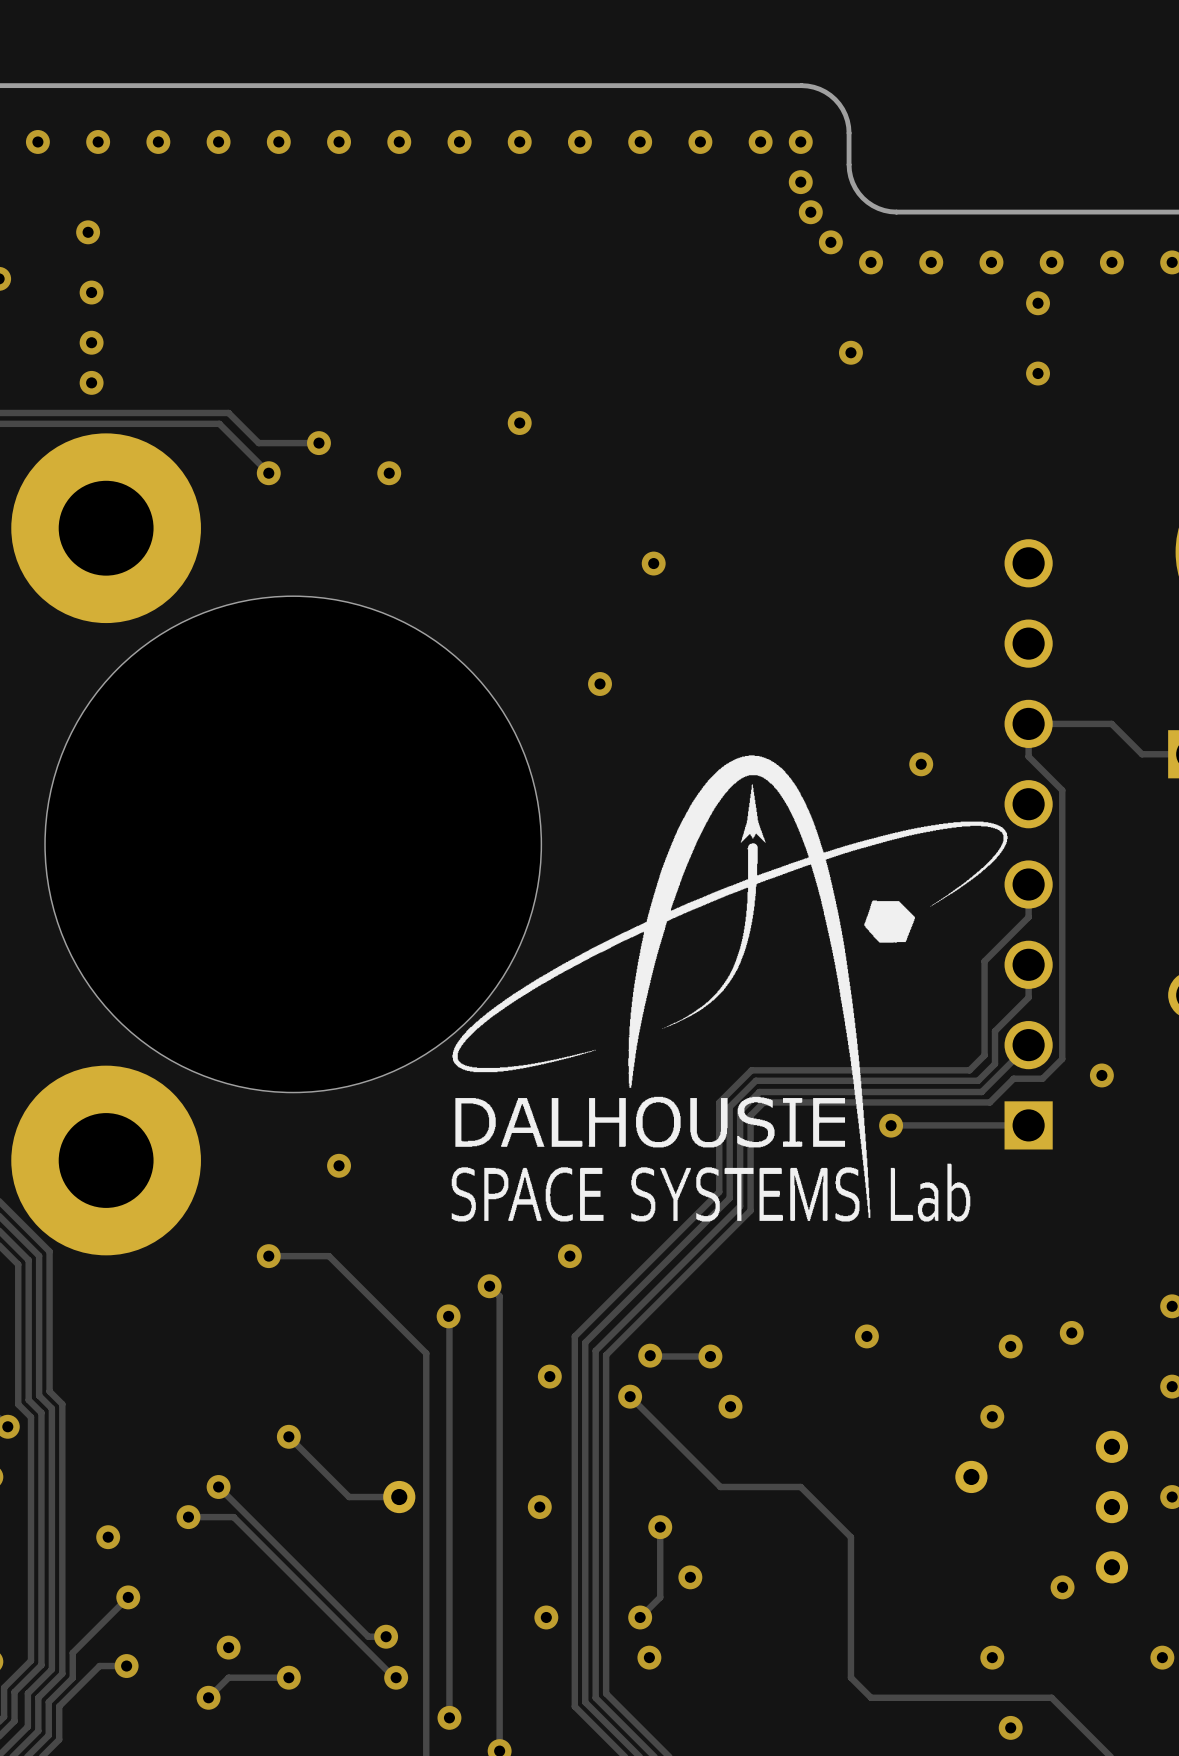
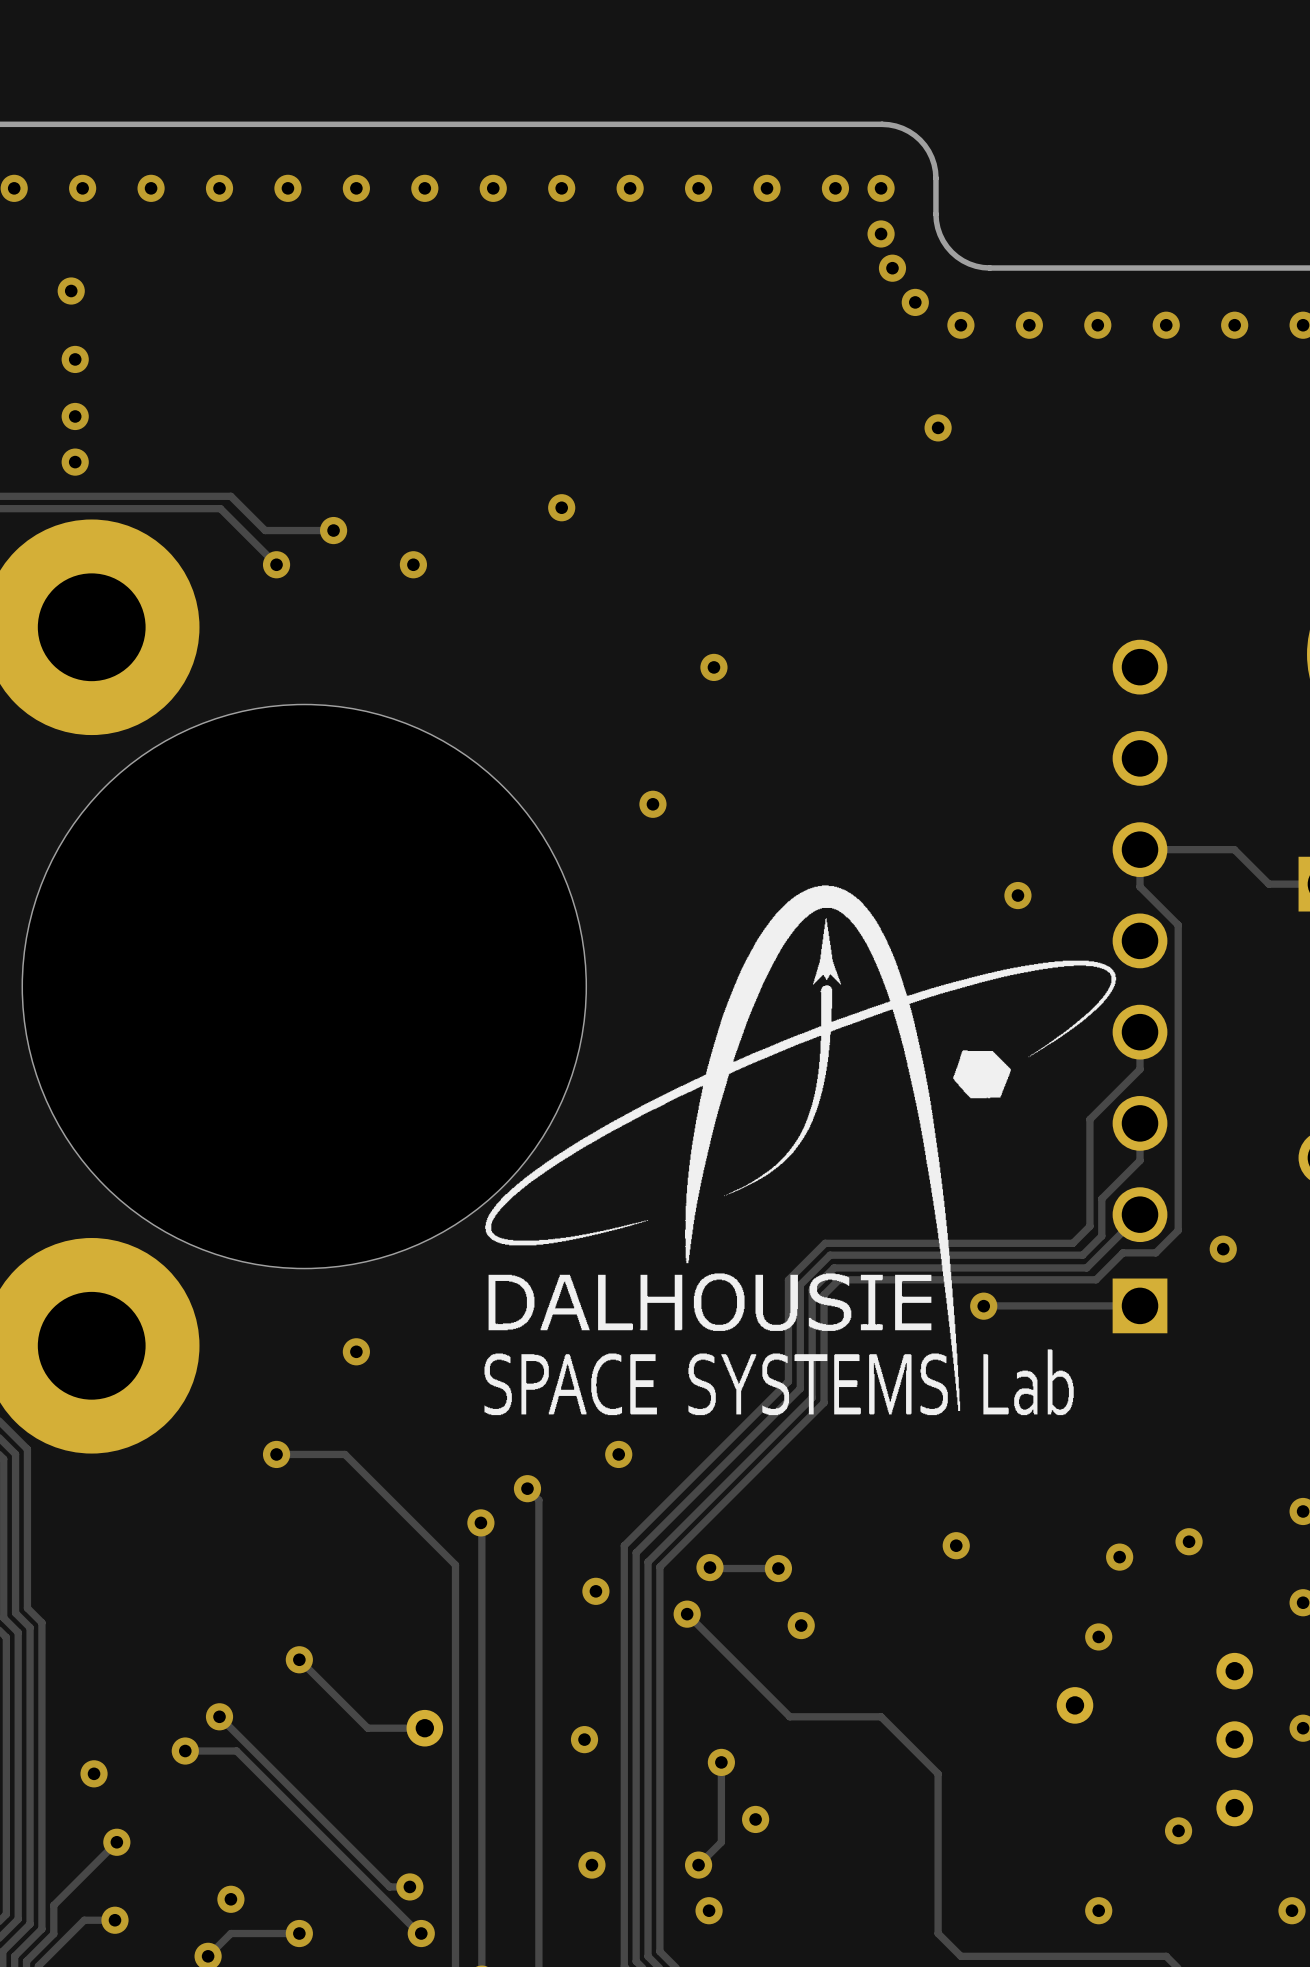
via: (1038, 303) -> none
via: (1038, 373) -> none

